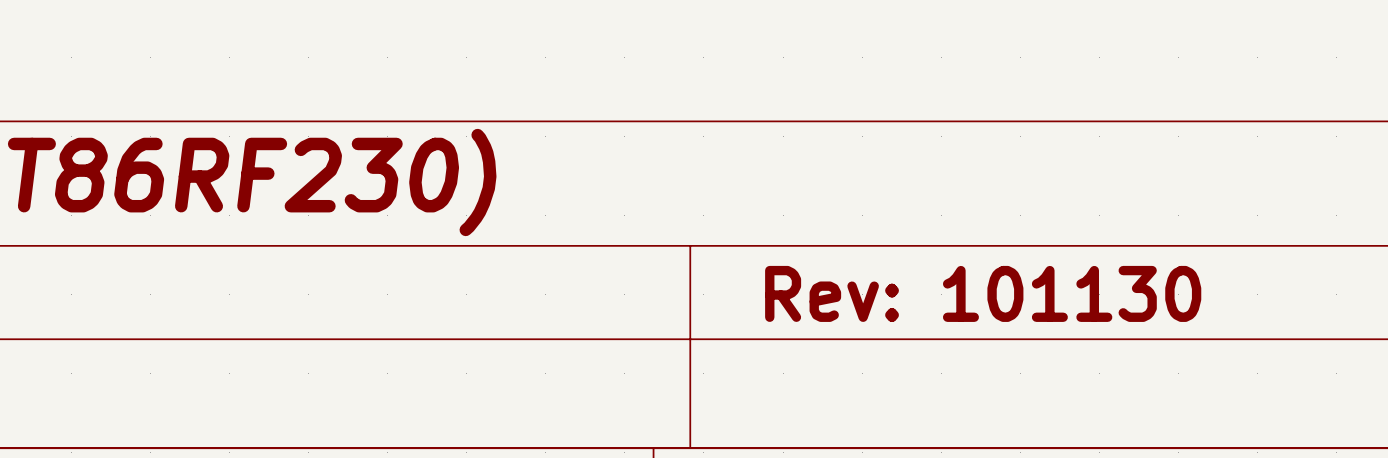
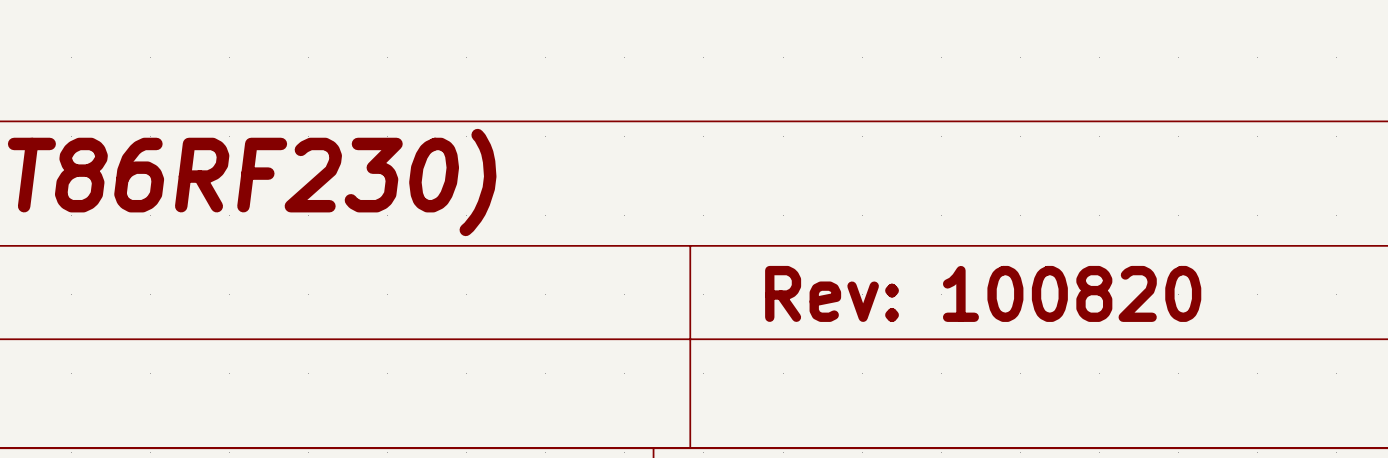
title block: Rev: 101130 (983, 293) -> Rev: 100820 (983, 293)

